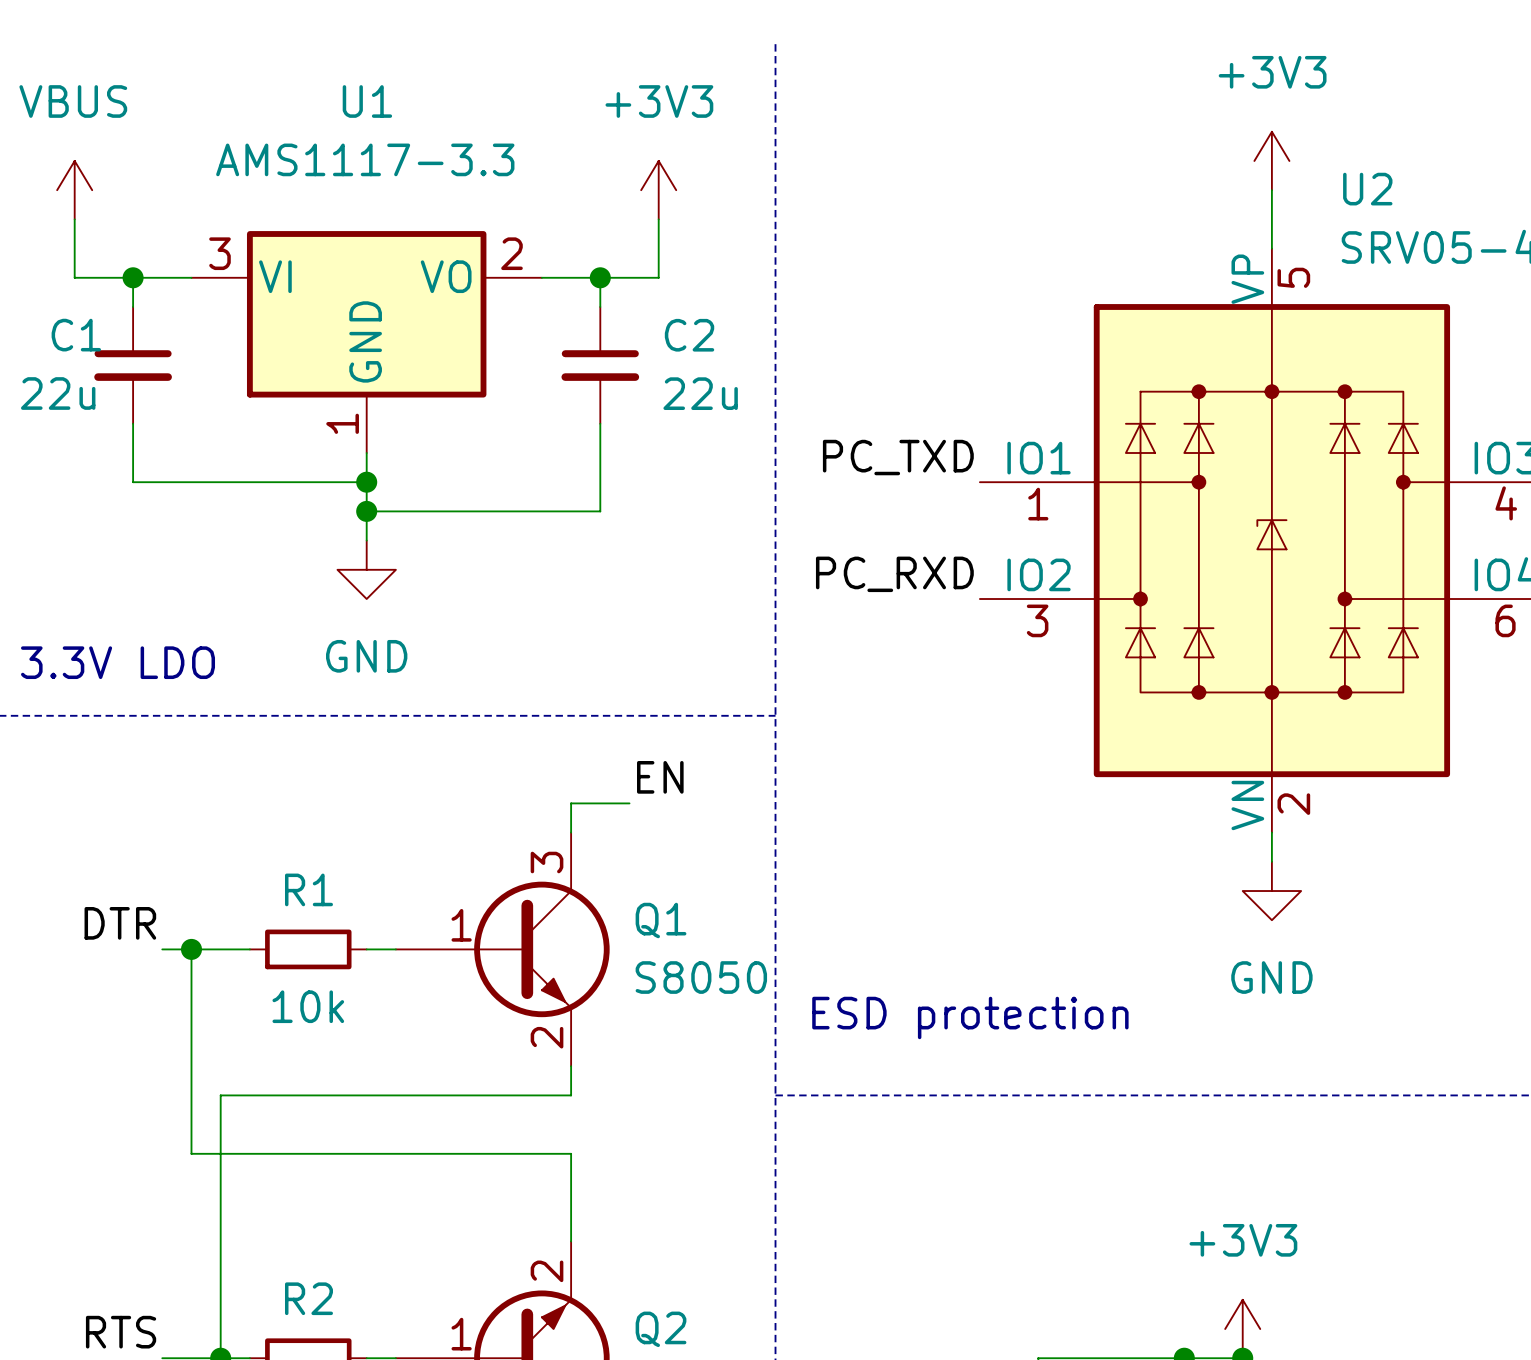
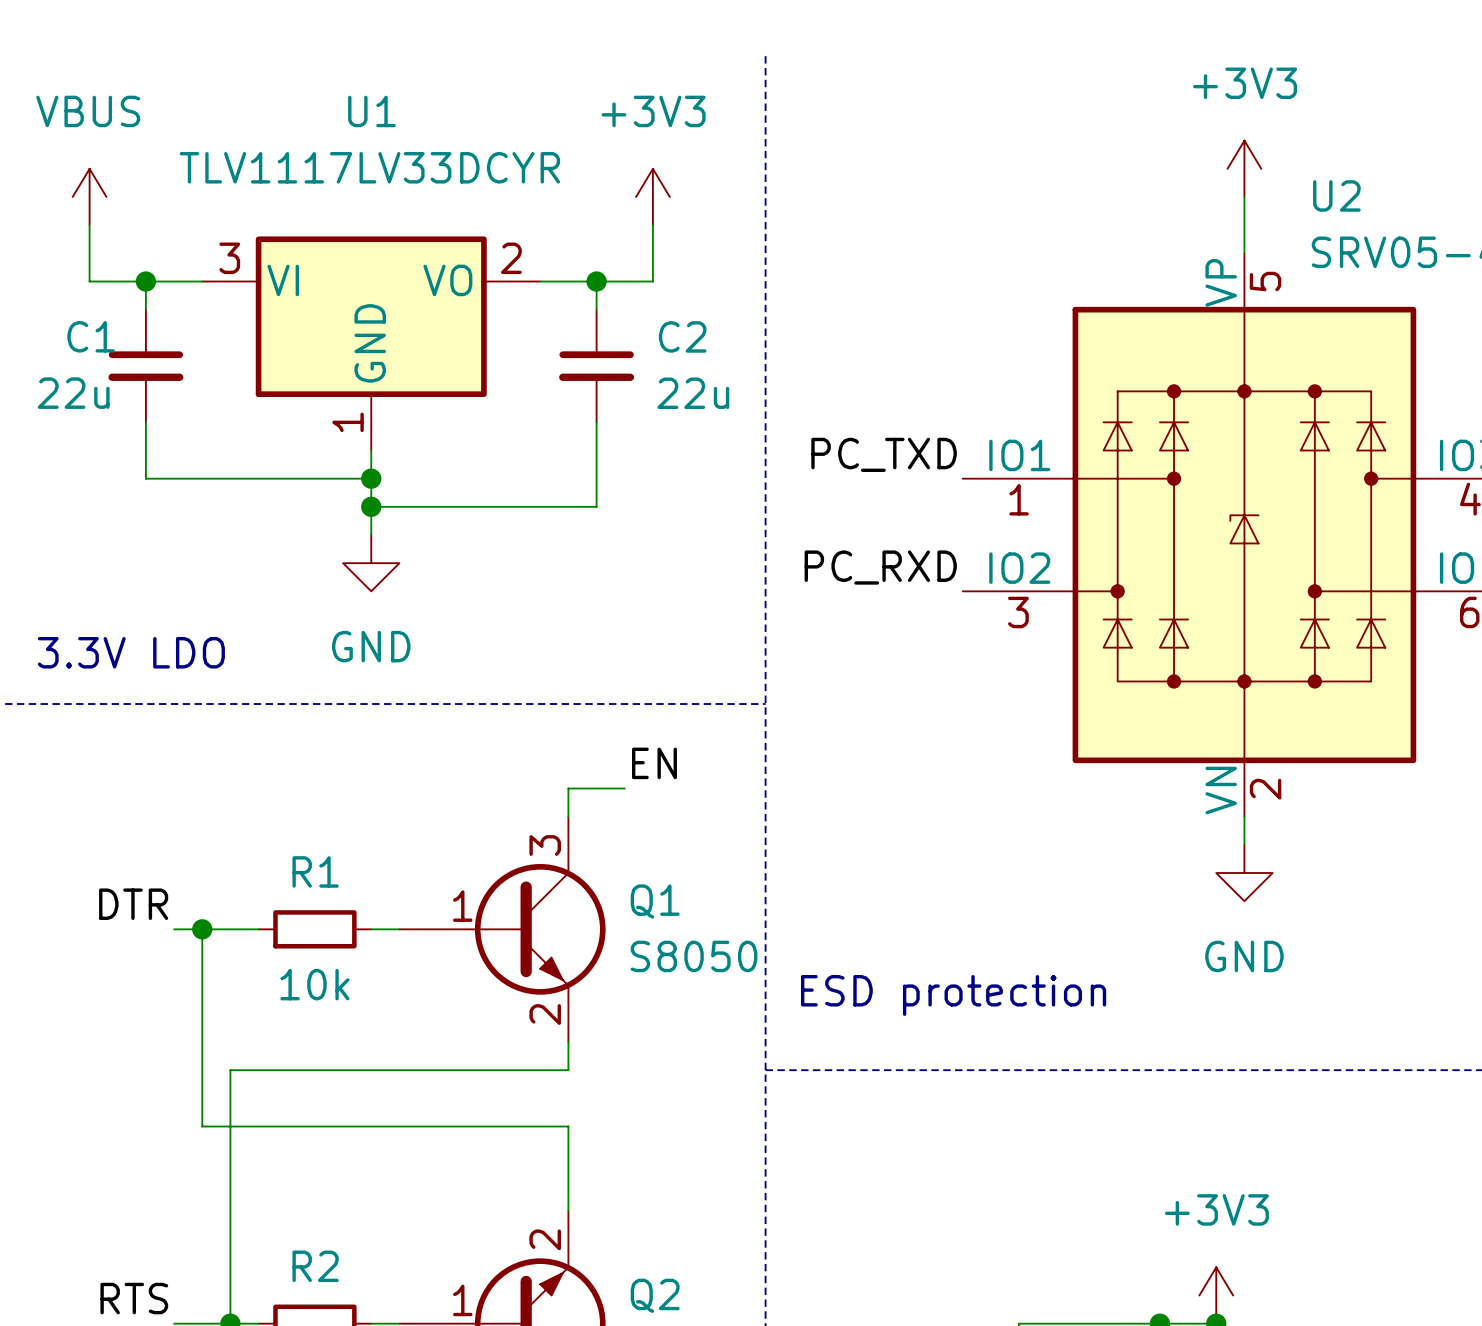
U1 value: AMS1117-3.3 (365, 159) -> TLV1117LV33DCYR (369, 167)

